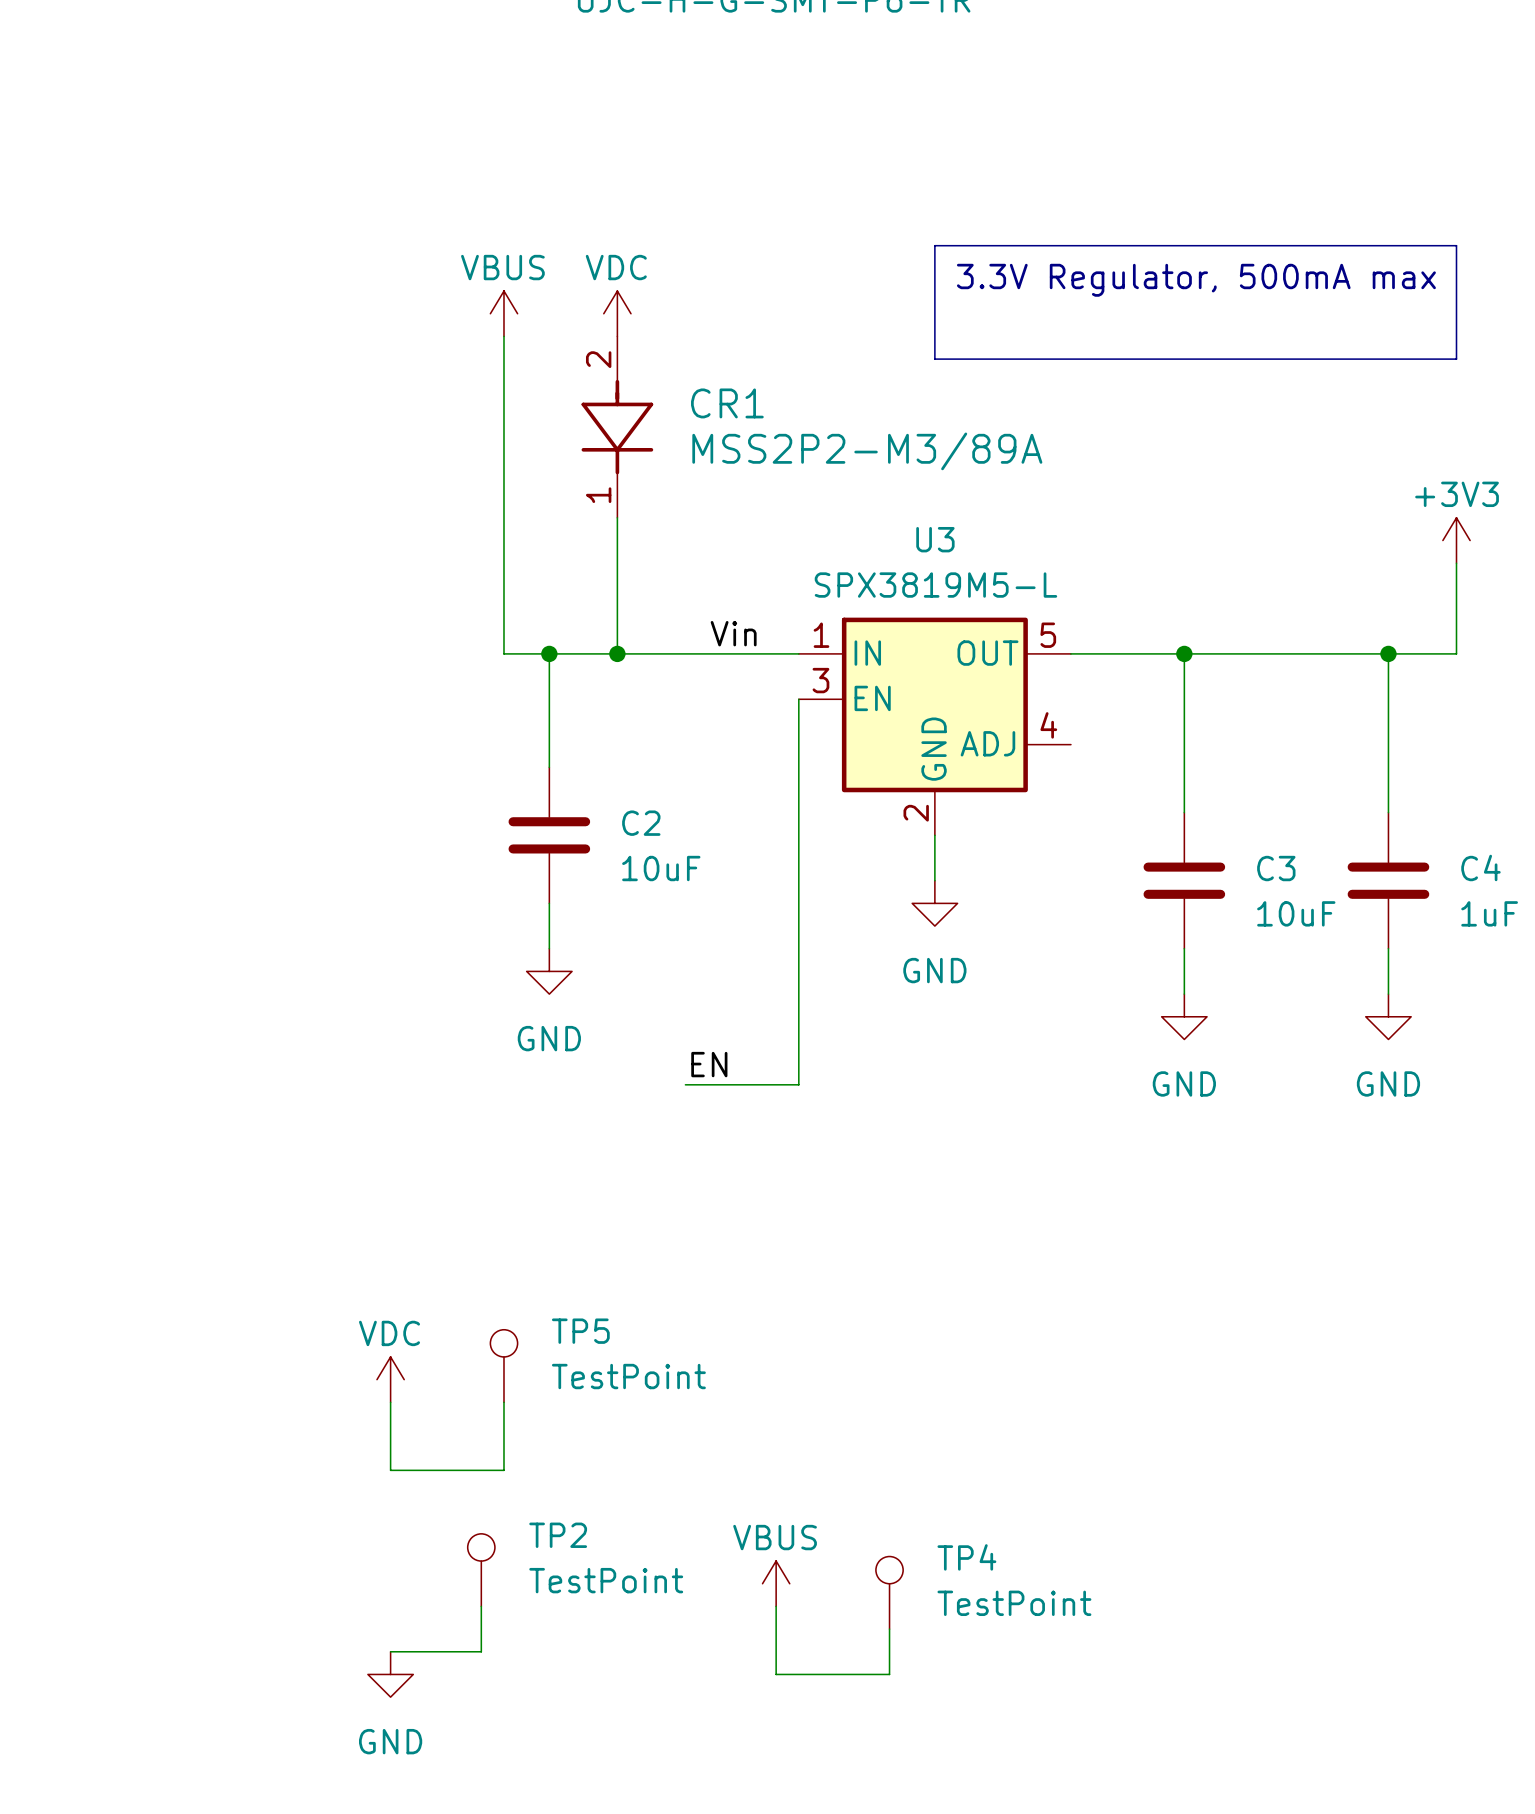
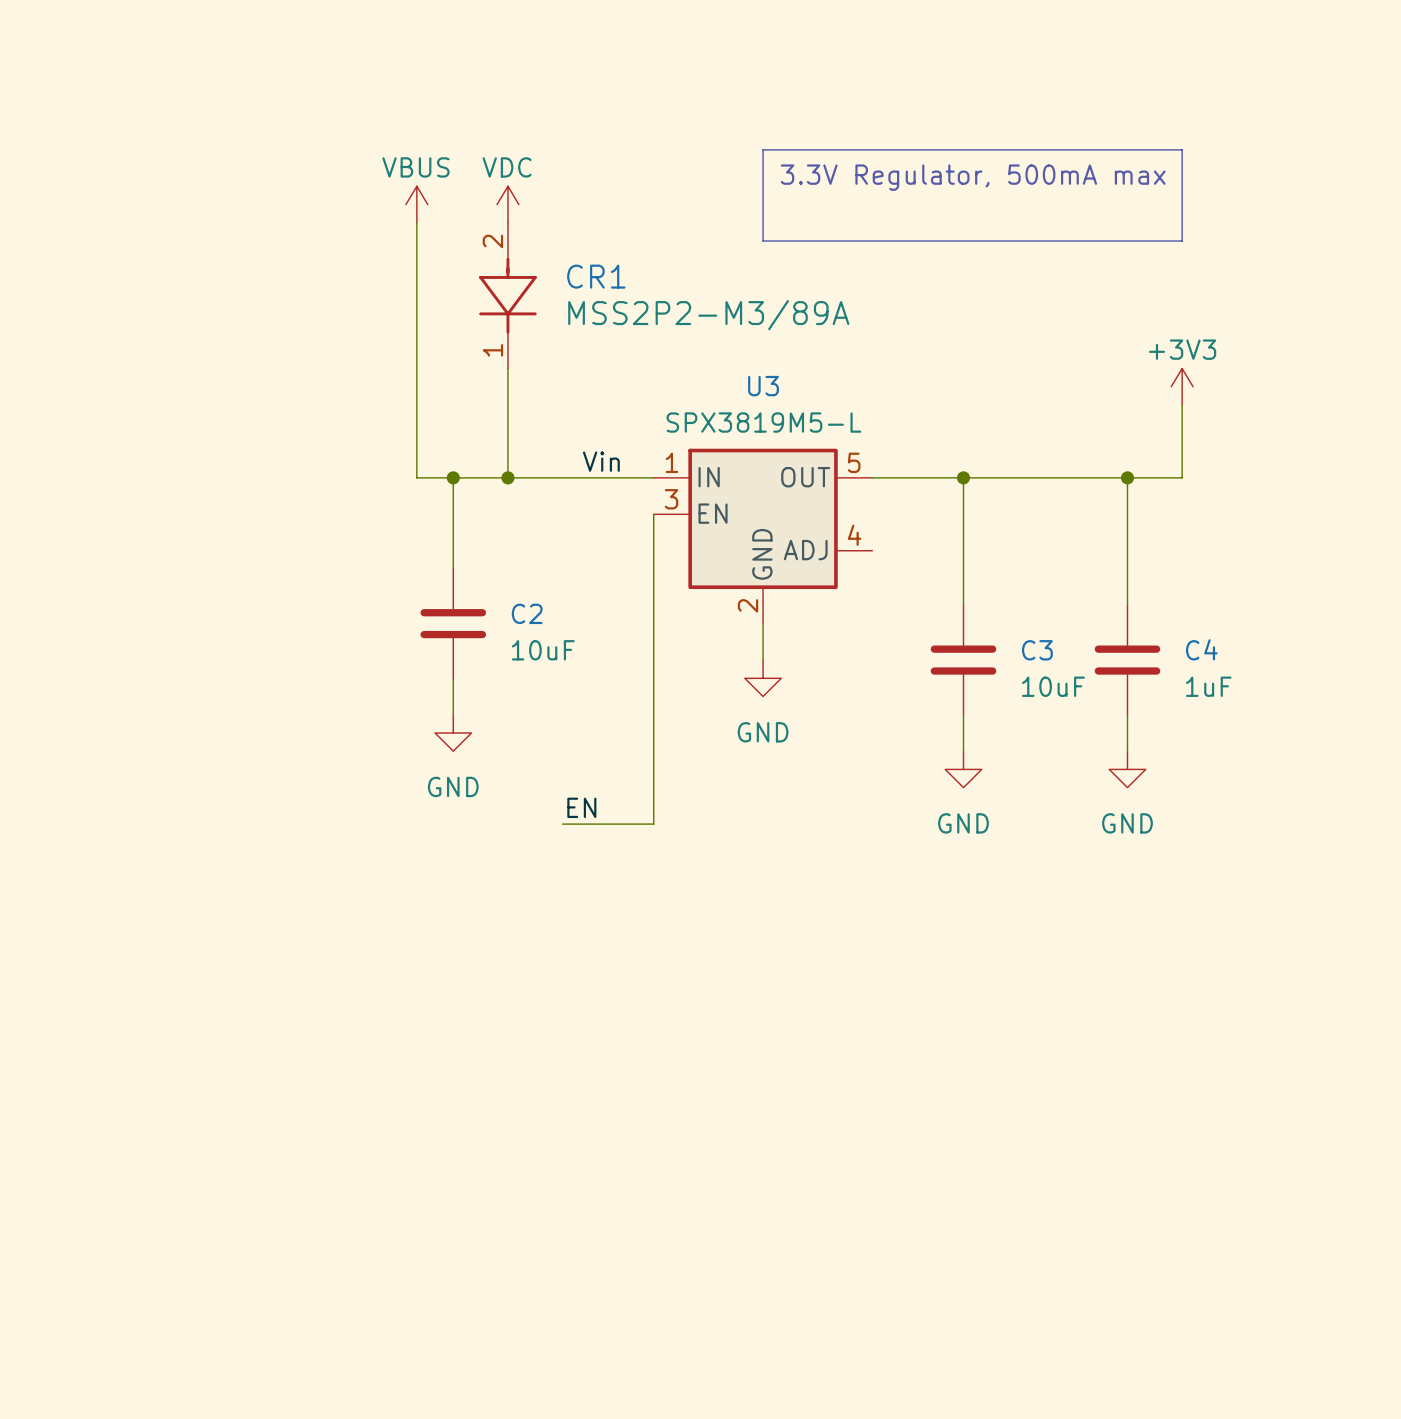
TP5: TestPoint (503, 1366) -> none
power symbol: VDC (390, 1379) -> none
wire: (390, 1402) (390, 1470) (503, 1470) (503, 1402) -> none
TP2: TestPoint (481, 1570) -> none
power symbol: VBUS (776, 1583) -> none
TP4: TestPoint (889, 1592) -> none
wire: (481, 1606) (481, 1651) (390, 1651) -> none
wire: (776, 1606) (776, 1674) (889, 1674) (889, 1629) -> none
power symbol: GND (390, 1674) -> none

